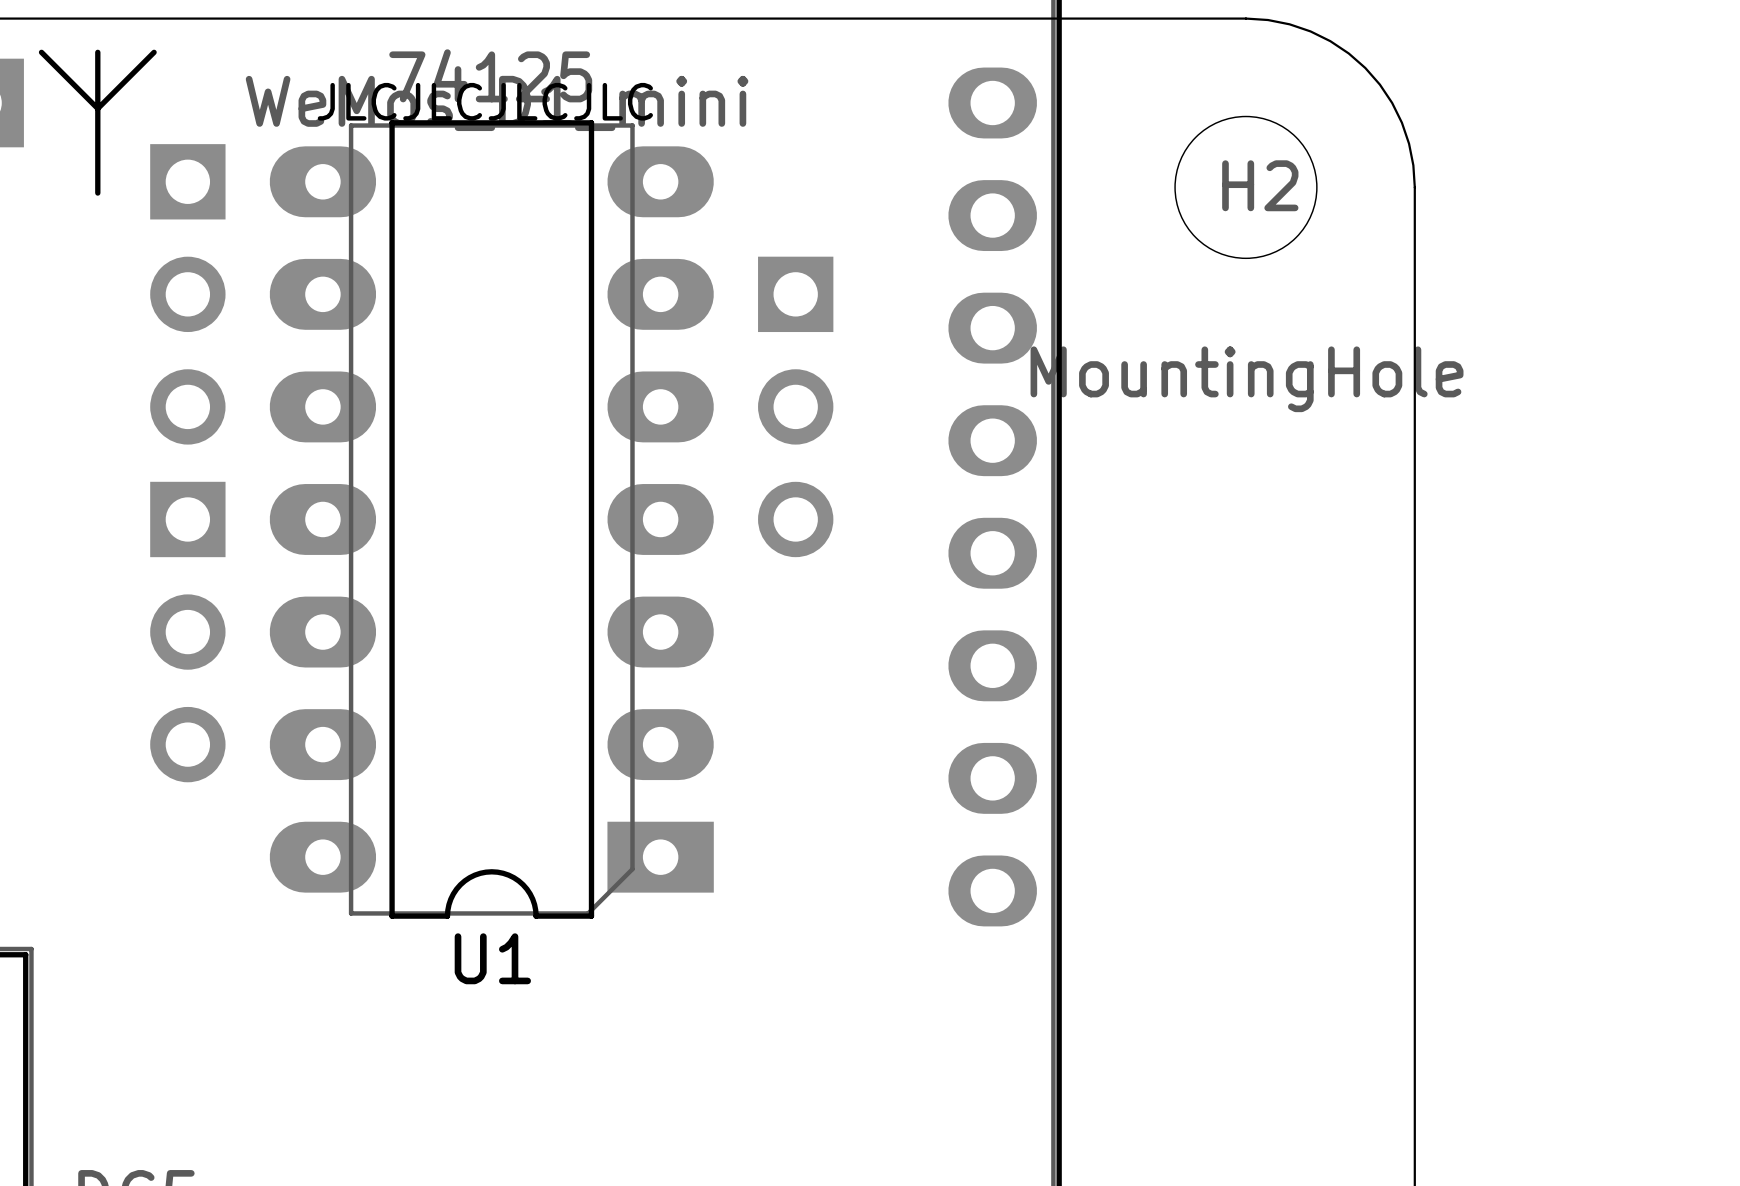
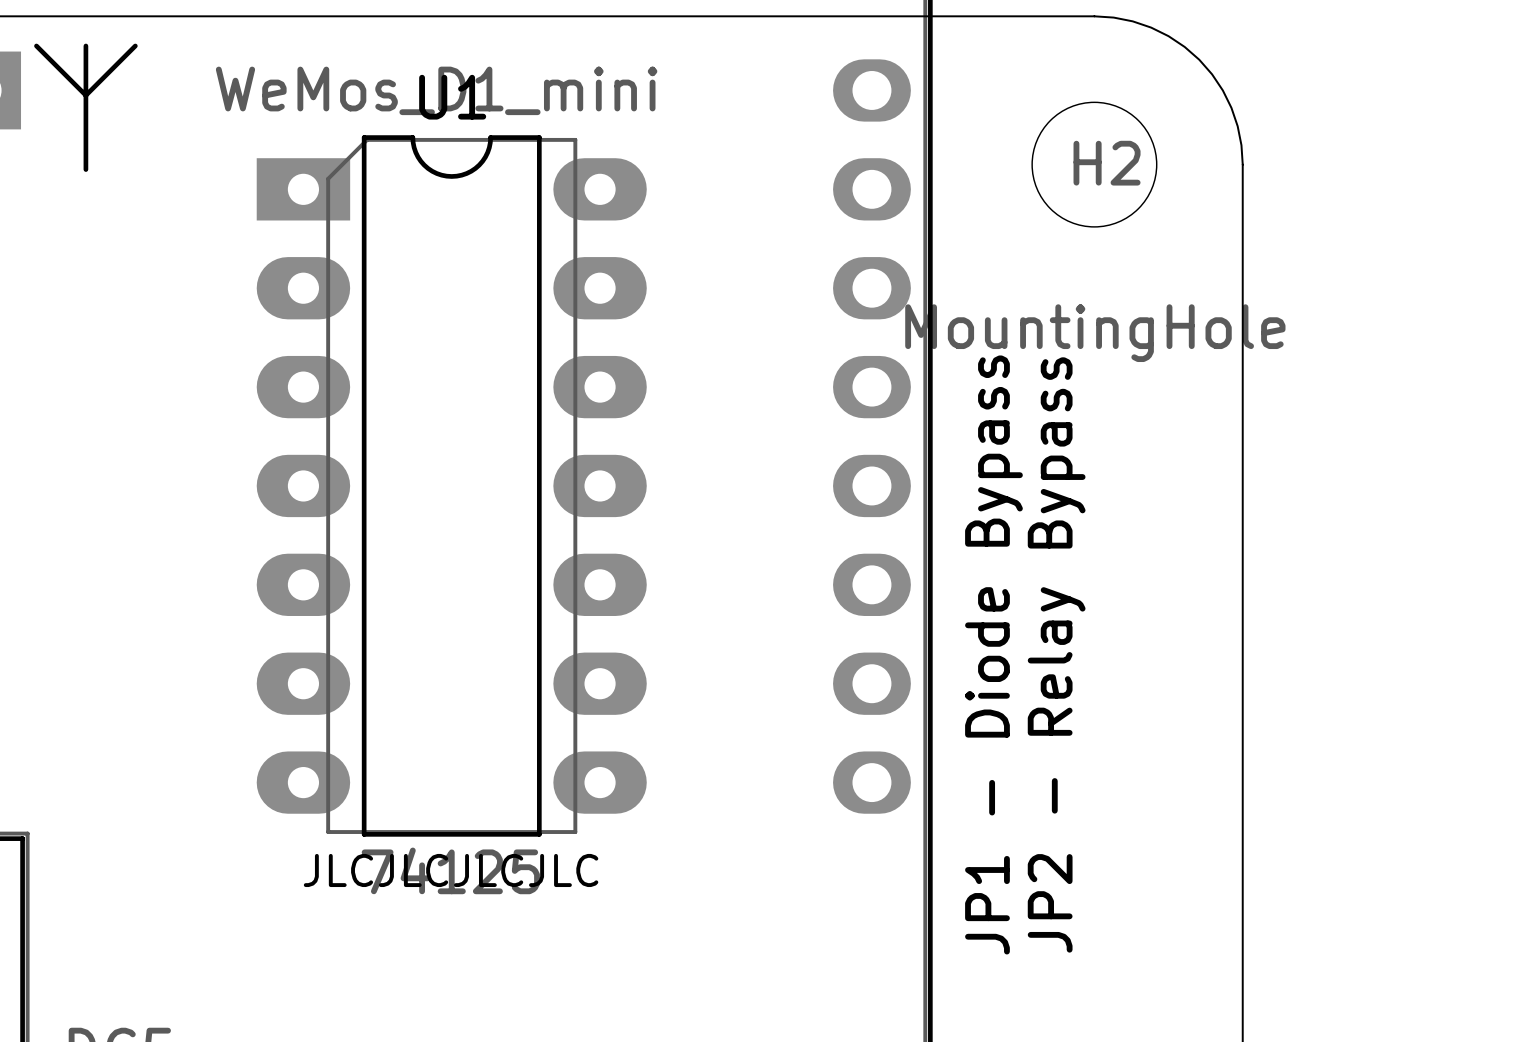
text position: JLCJLCJLCJLC (485, 101) -> JLCJLCJLCJLC (451, 870)
part: (187, 294) -> none
part: (795, 406) -> none
U1 rotation: 0° (491, 519) -> 180° (451, 485)
part: (187, 632) -> none
text: none -> JP1 - Diode Bypass (993, 654)
text: none -> JP2 - Relay Bypass (1056, 654)

